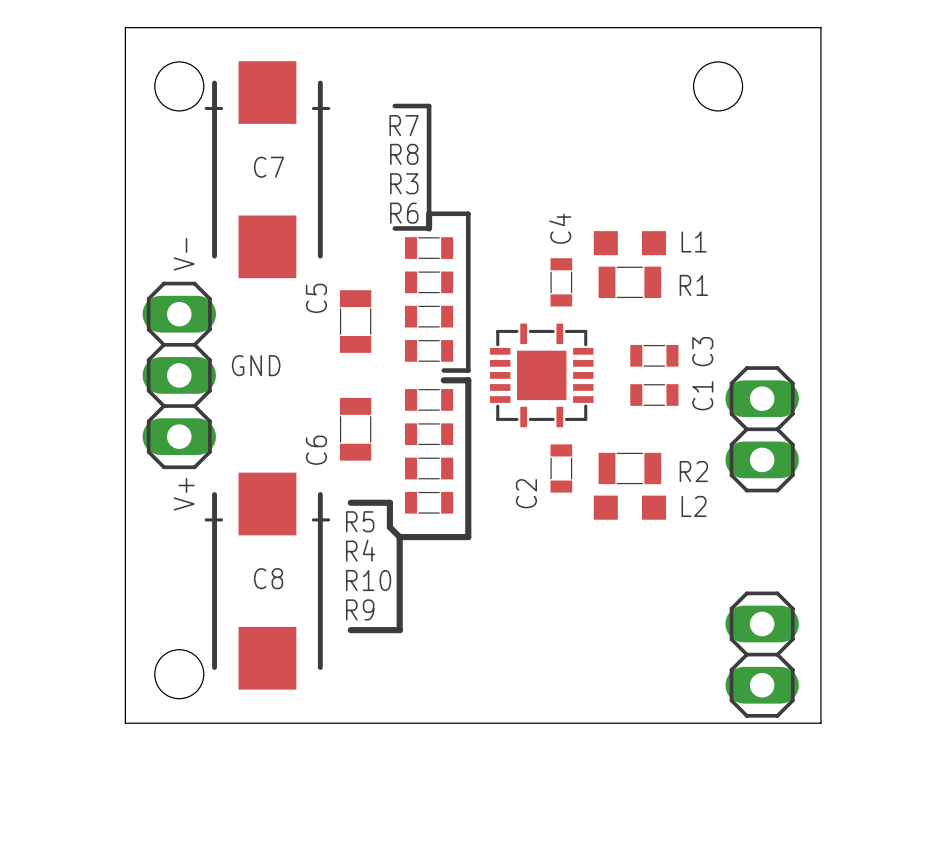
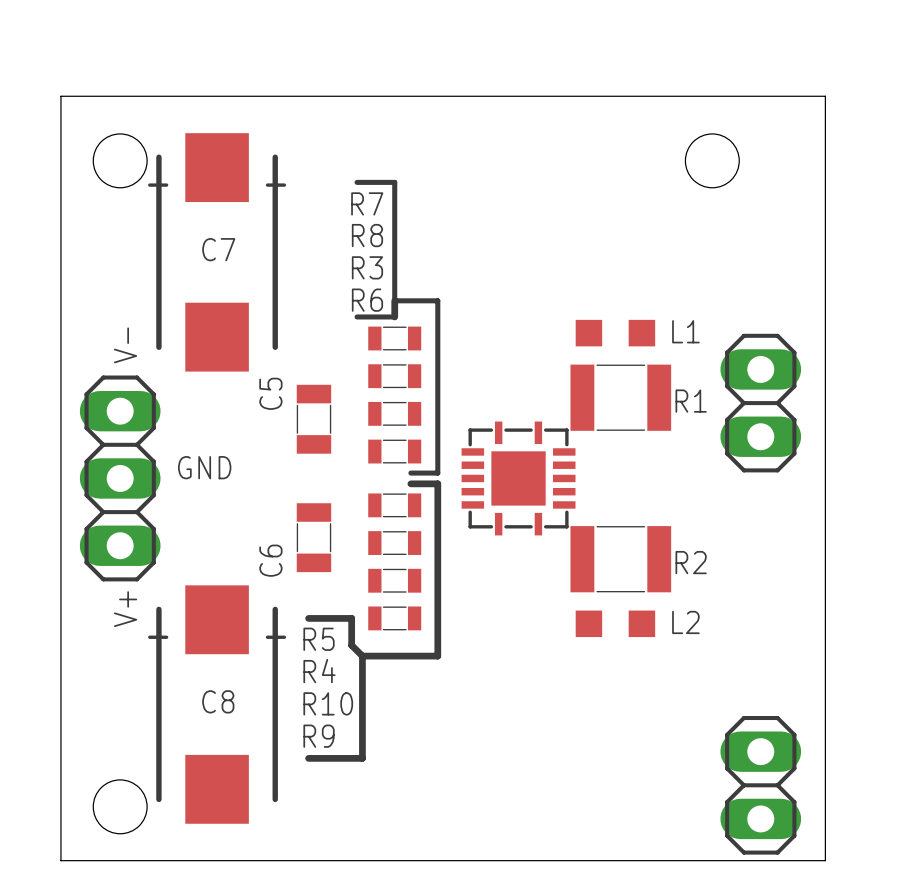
R1 footprint: [598, 266, 662, 299] -> [570, 364, 672, 431]
C4: (561, 282) -> none
C3: (654, 355) -> none
C1: (654, 395) -> none
part position: (762, 429) -> (760, 403)
R2 footprint: [598, 452, 662, 485] -> [570, 526, 672, 593]
C2: (561, 468) -> none

